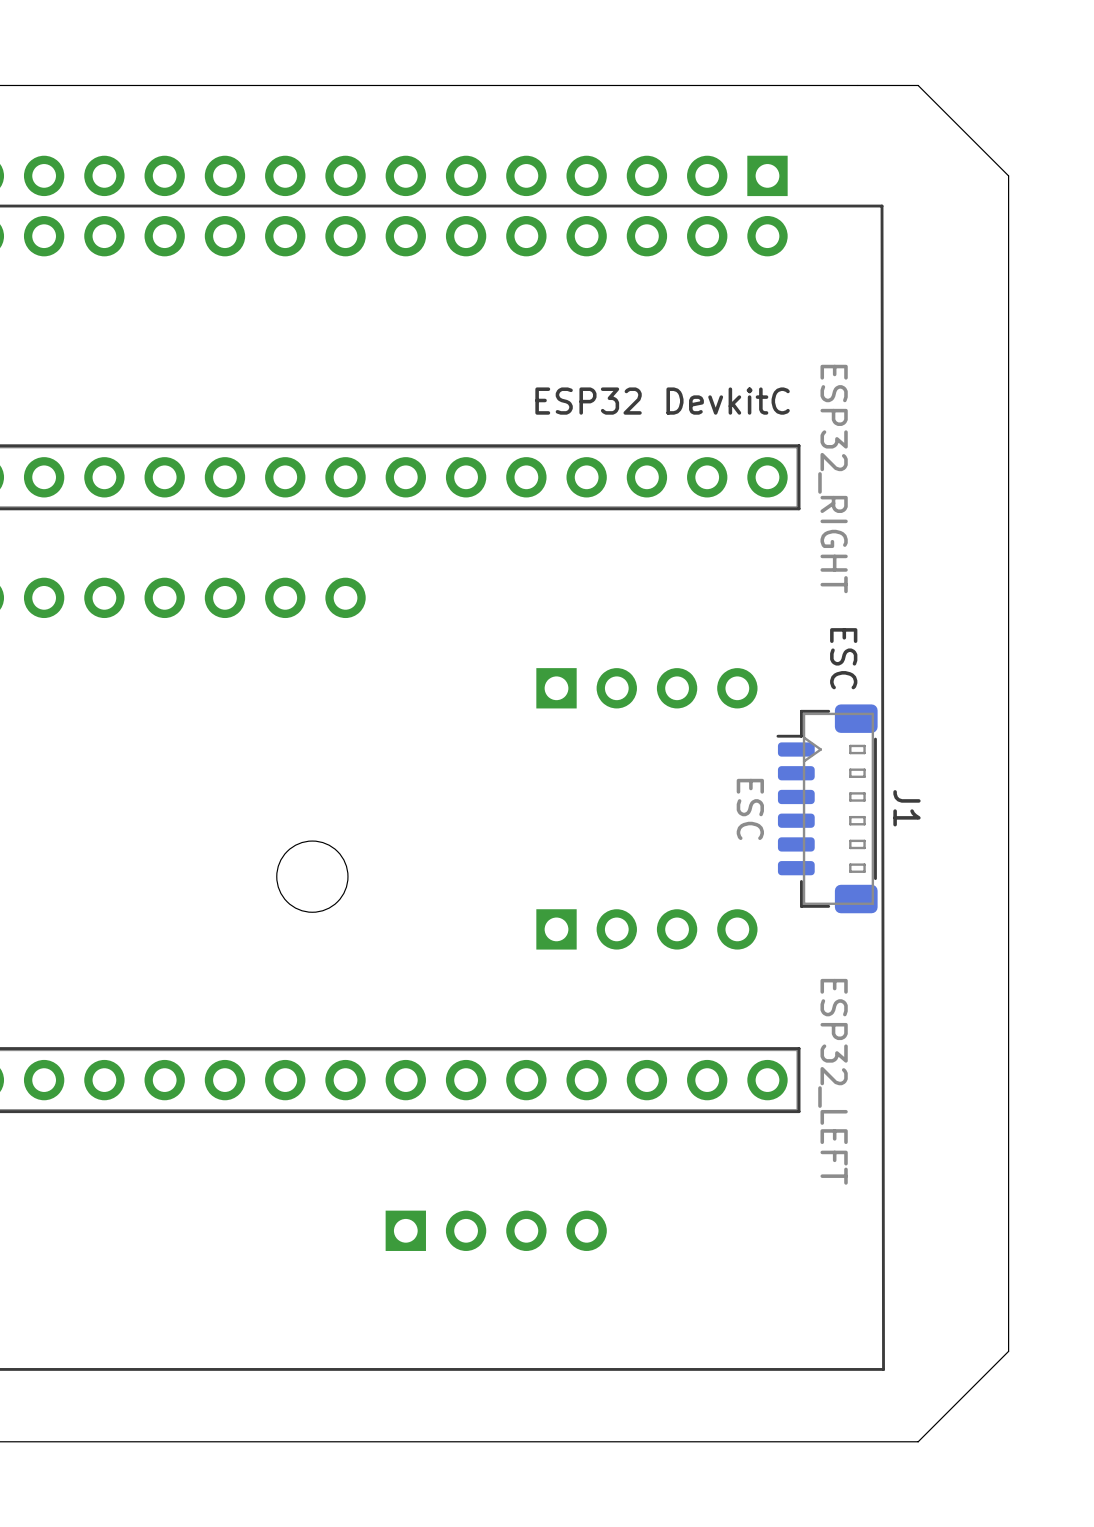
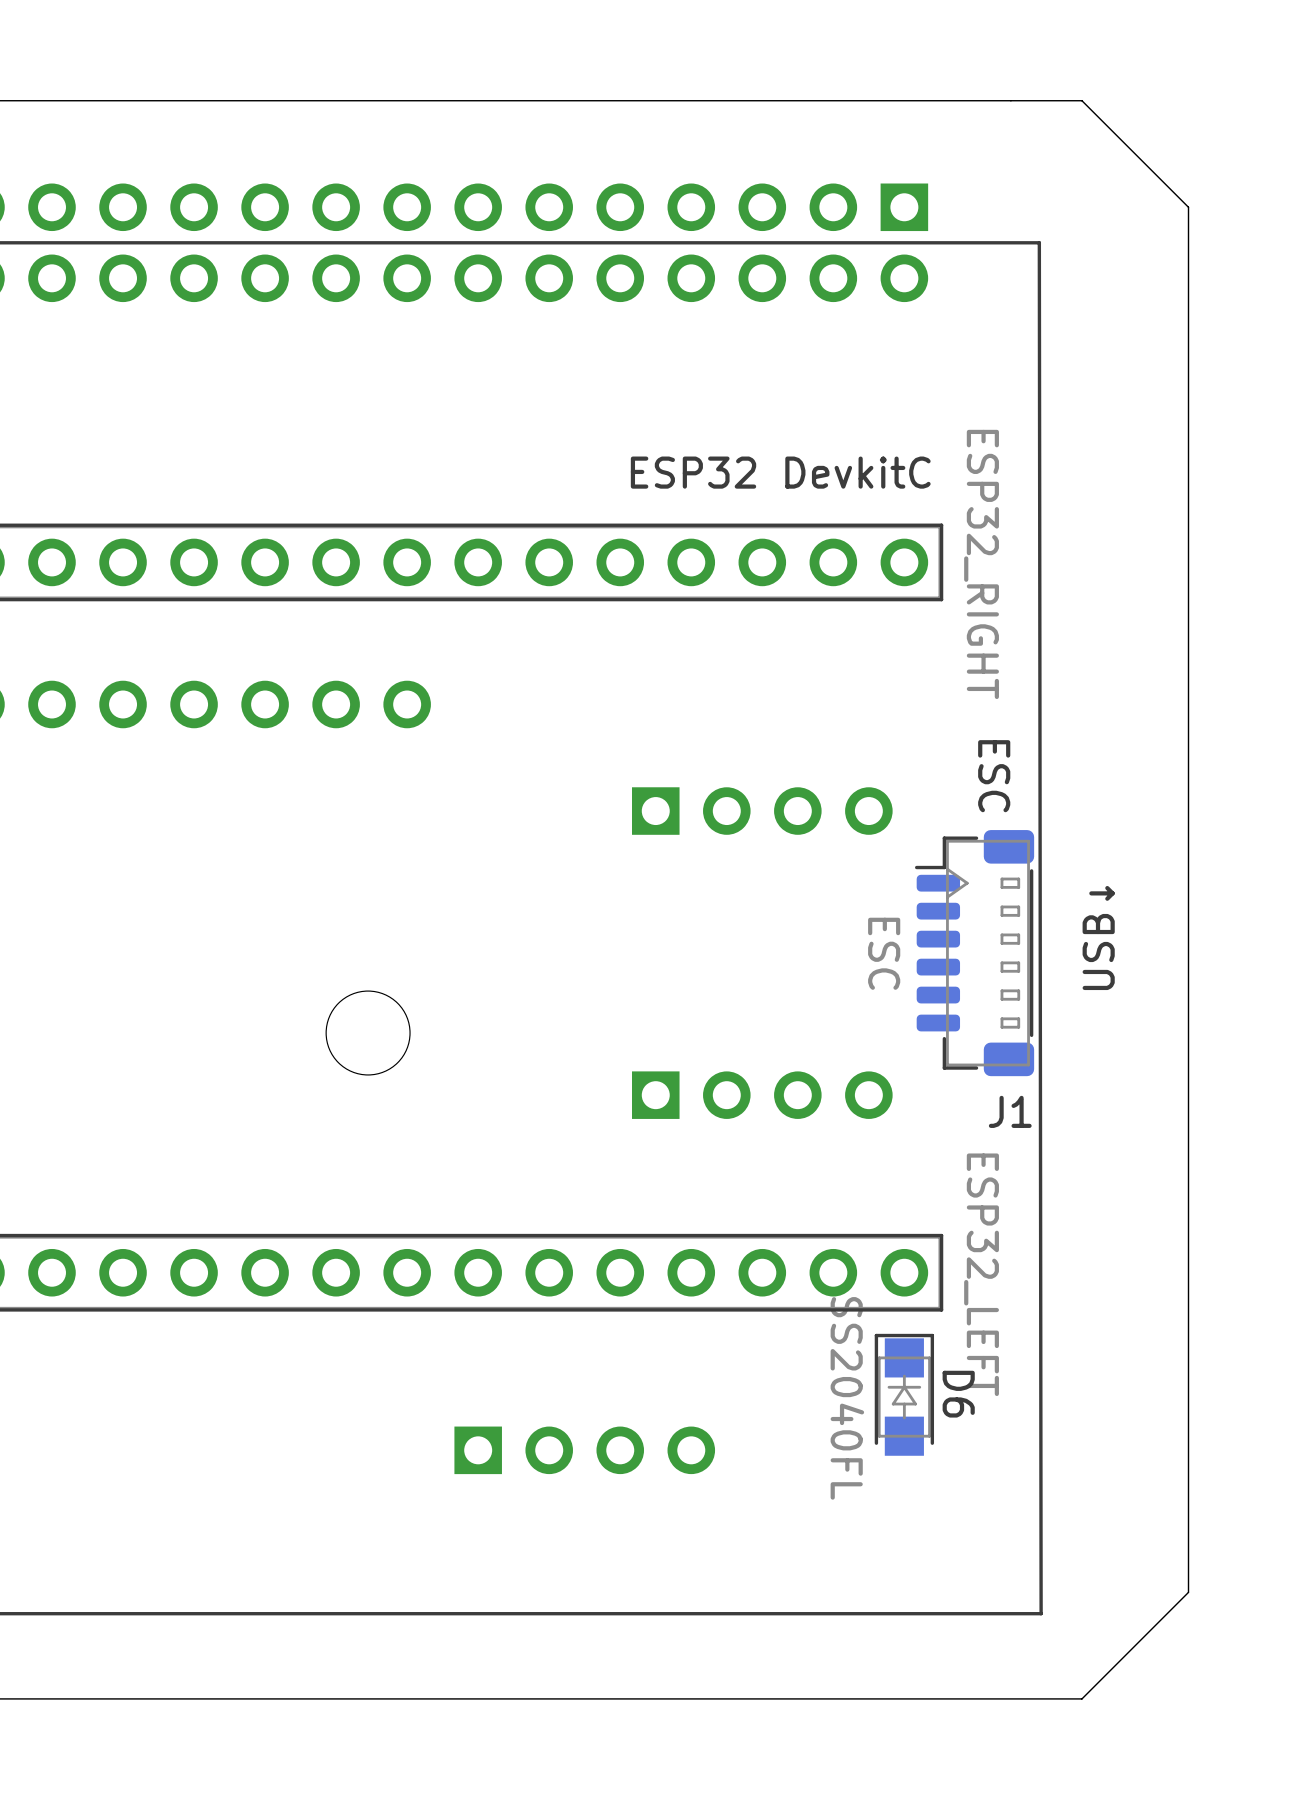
text: none -> USB↓ (1098, 938)
J1 name rotation: 0° (906, 808) -> 90° counterclockwise (1010, 1111)
J1 name position: J1 (906, 808) -> J1 (1010, 1111)
D6: none -> SS2040FL (904, 1394)

